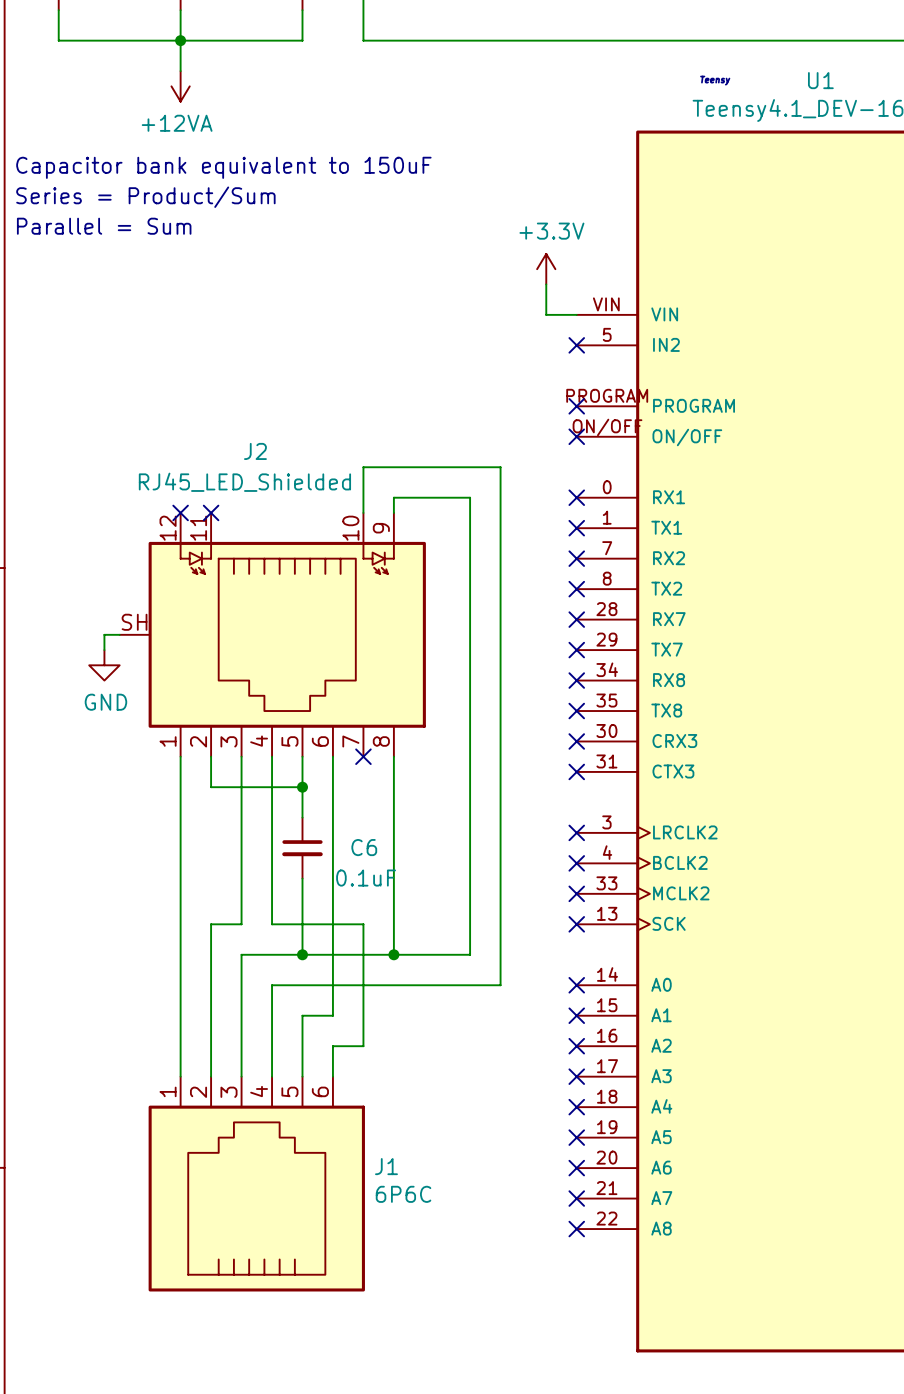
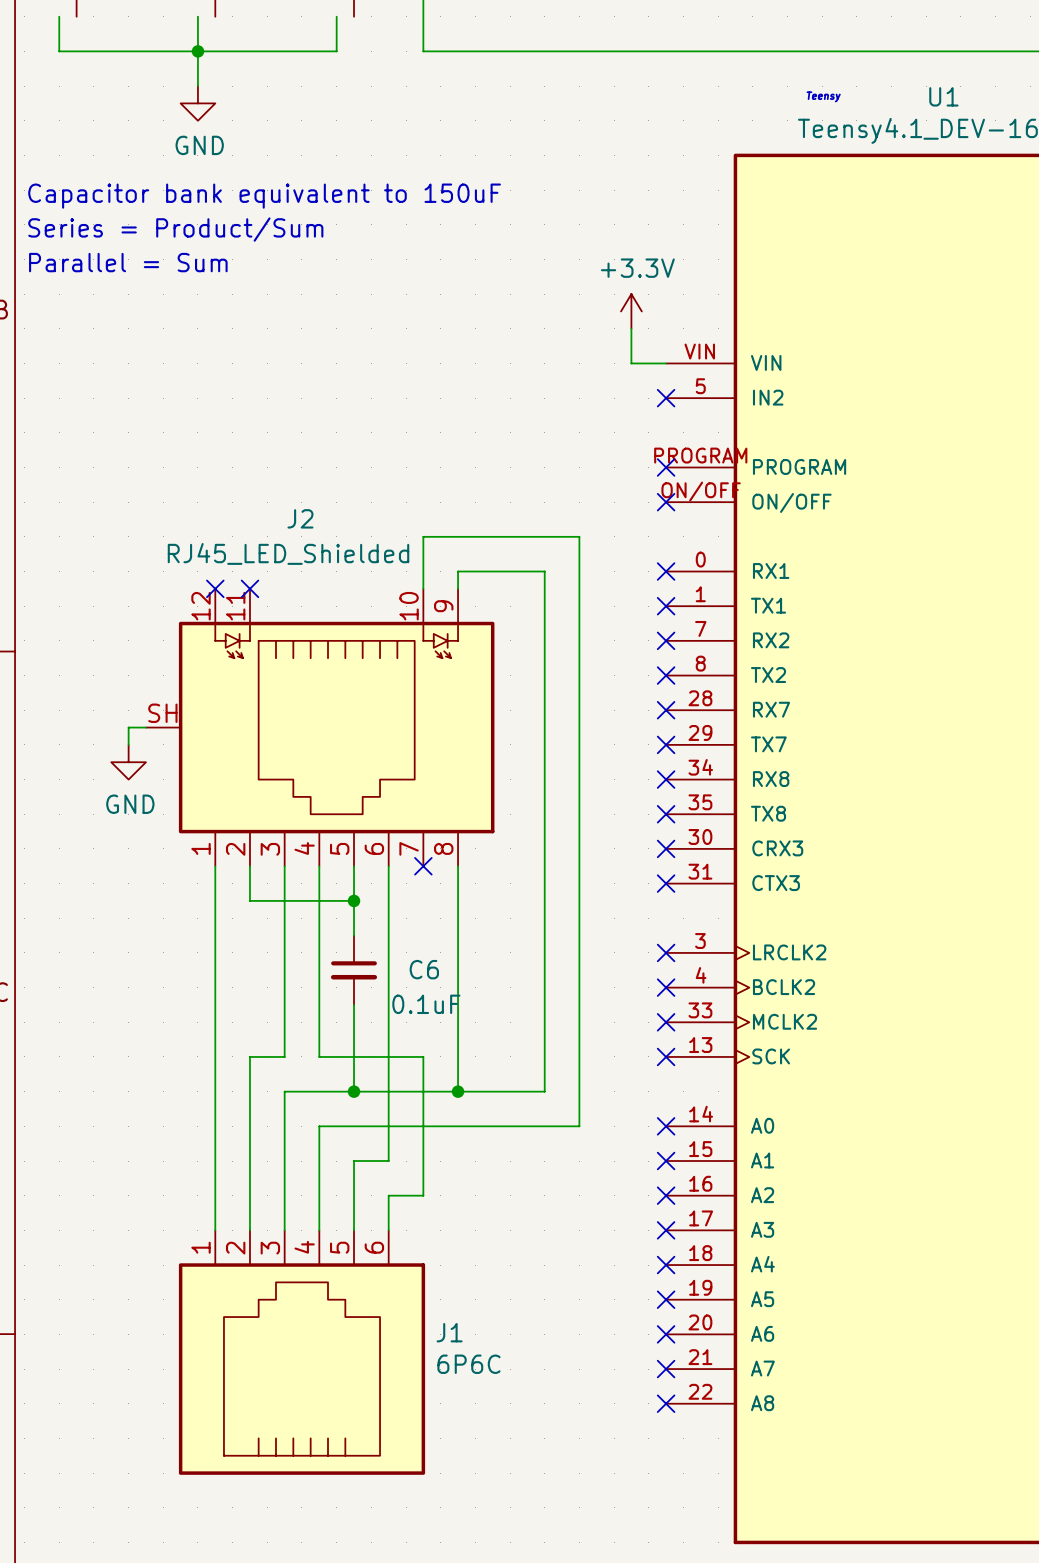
wire: (58, 10) (58, 40) -> (59, 16) (59, 51) (76, 51)
wire: (180, 10) (180, 71) -> (197, 16) (197, 86)
wire: (302, 10) (302, 40) (287, 40) -> (336, 16) (336, 51)
junction position: (180, 40) -> (197, 51)
power symbol: none -> GND (197, 103)
power symbol: +12VA (180, 86) -> none

